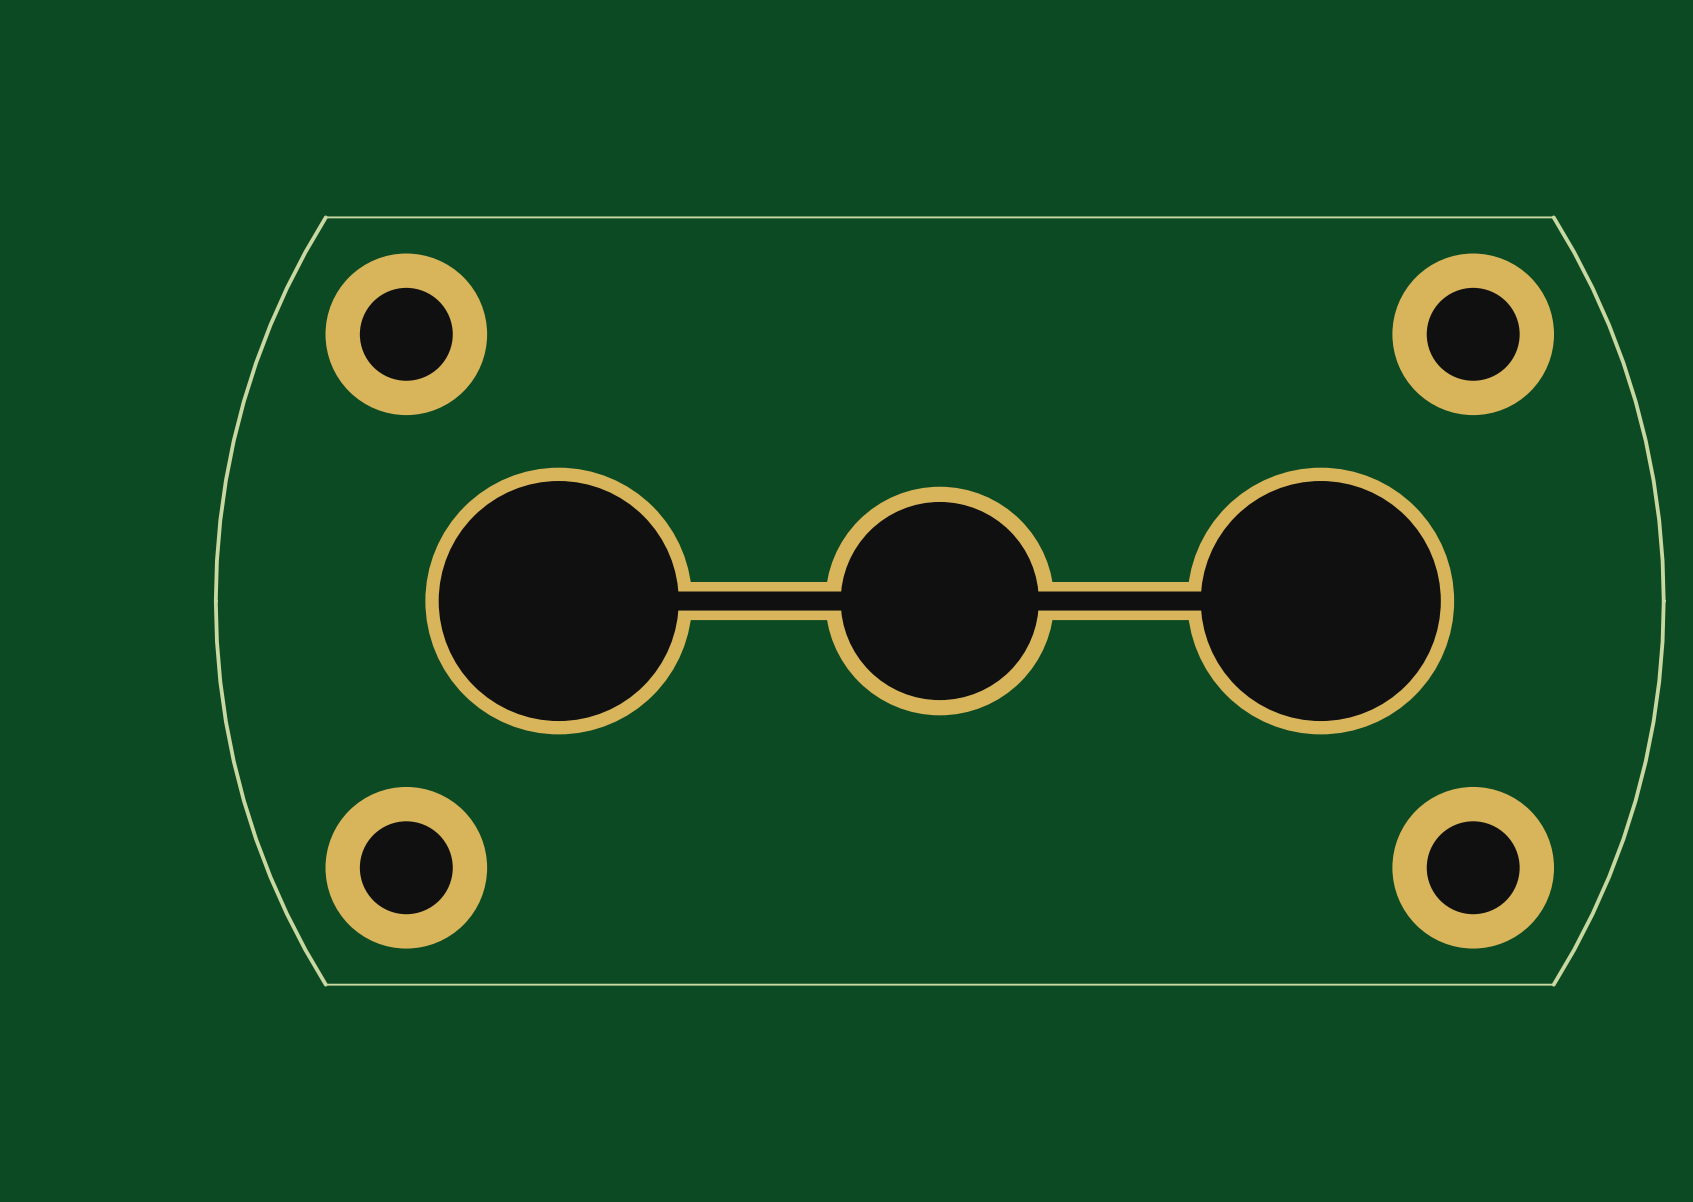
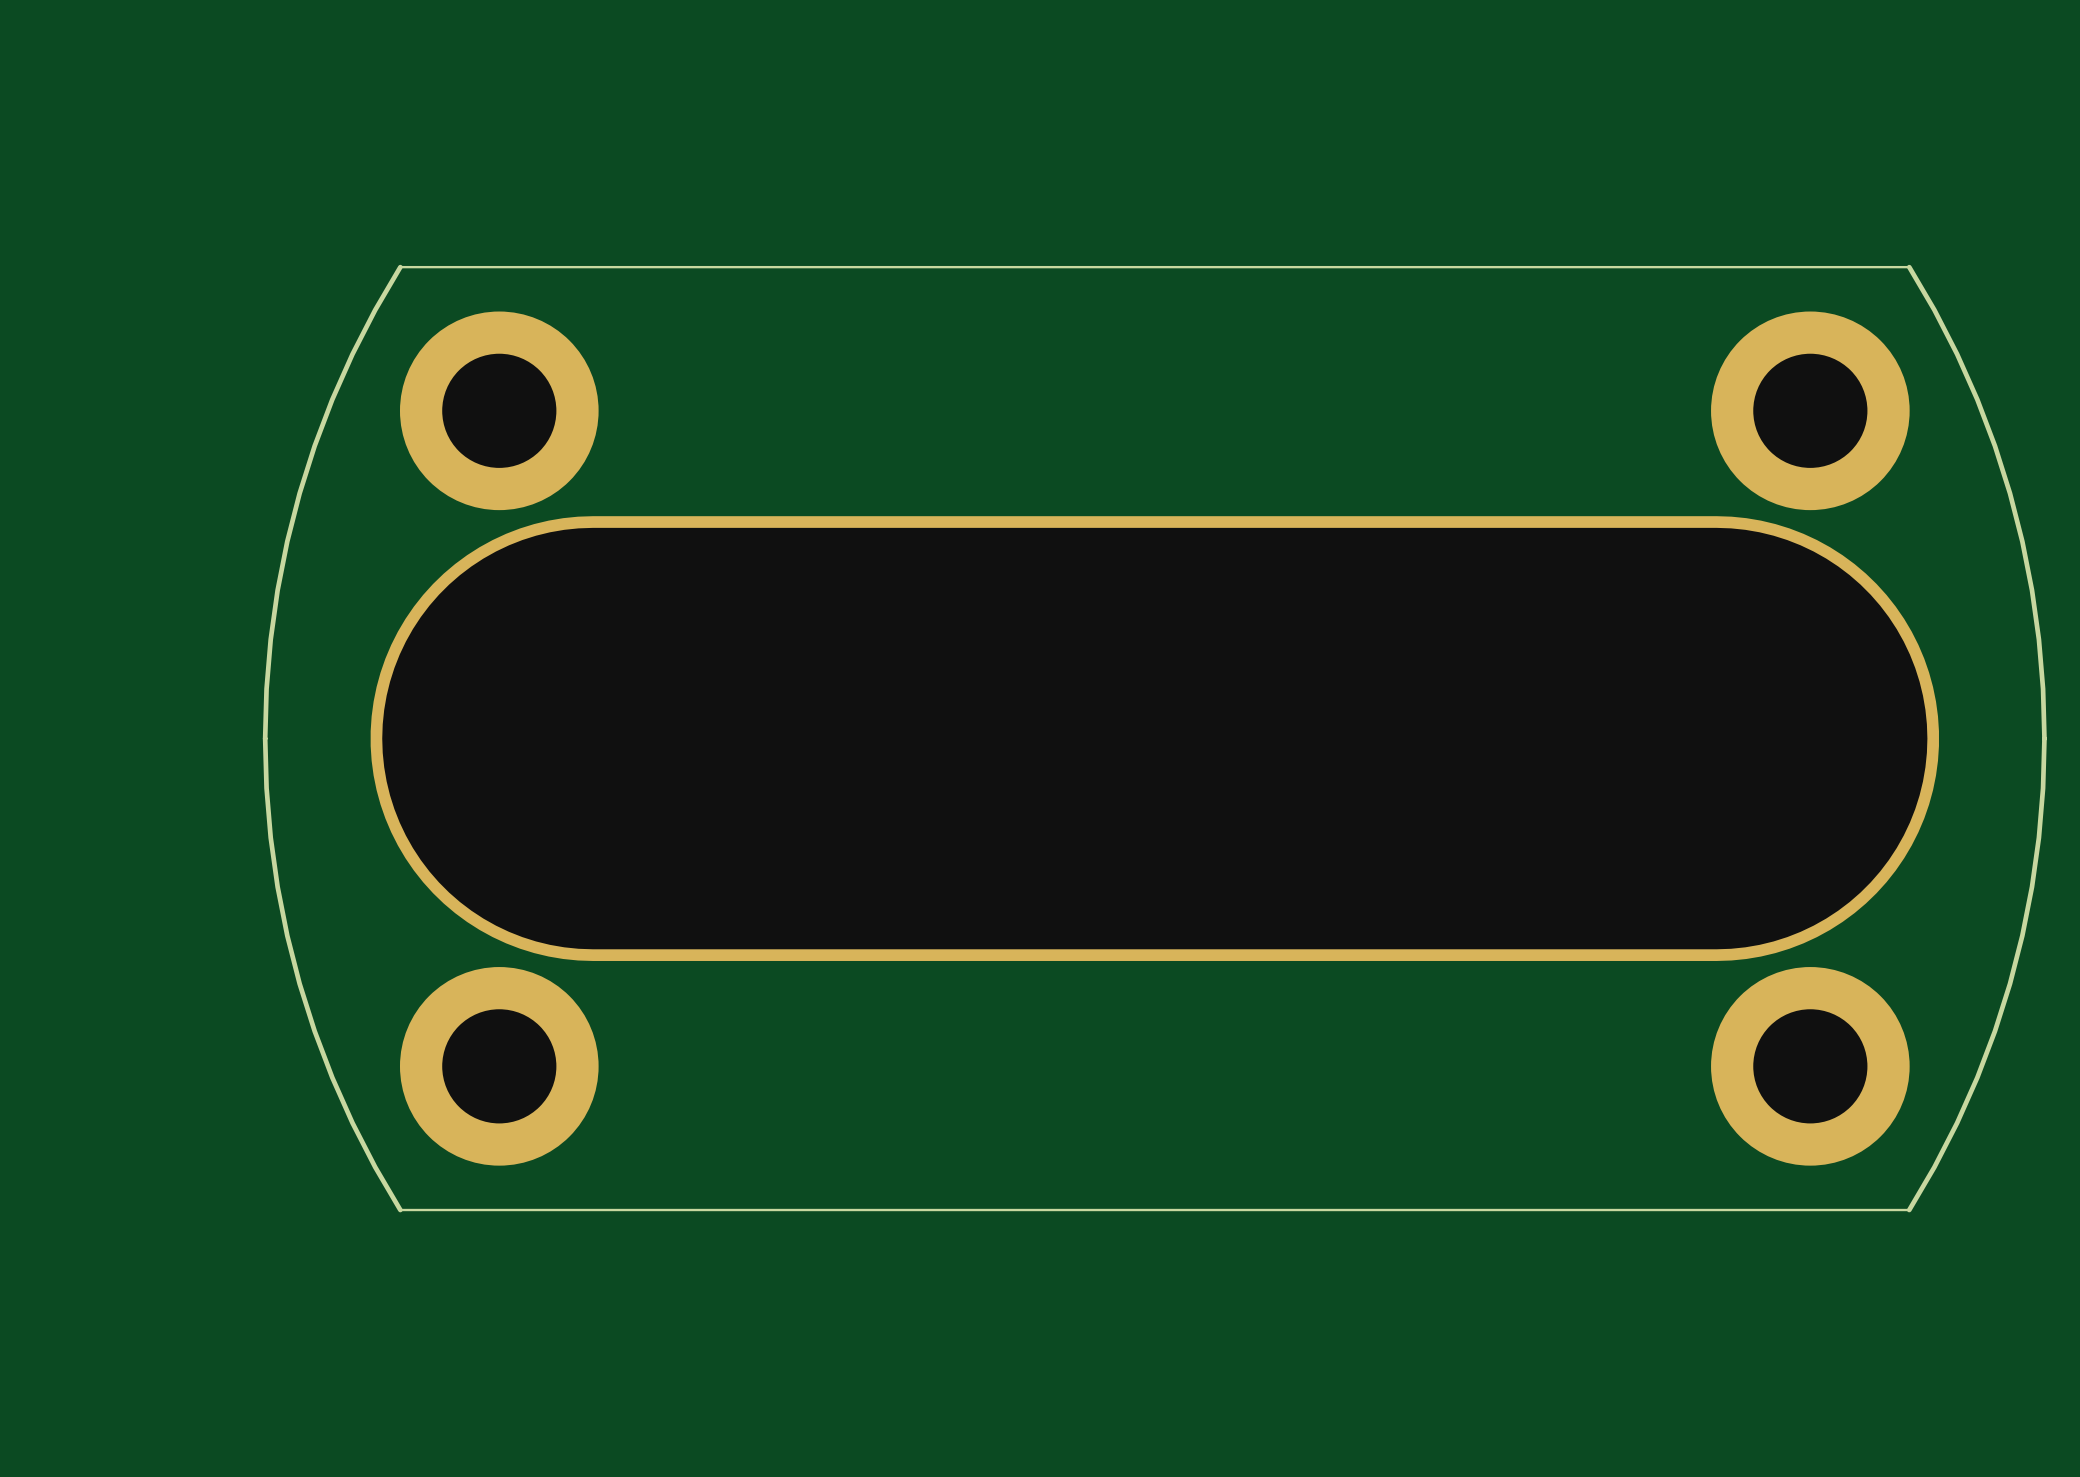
part footprint: [425, 467, 1455, 735] -> [370, 516, 1940, 961]

